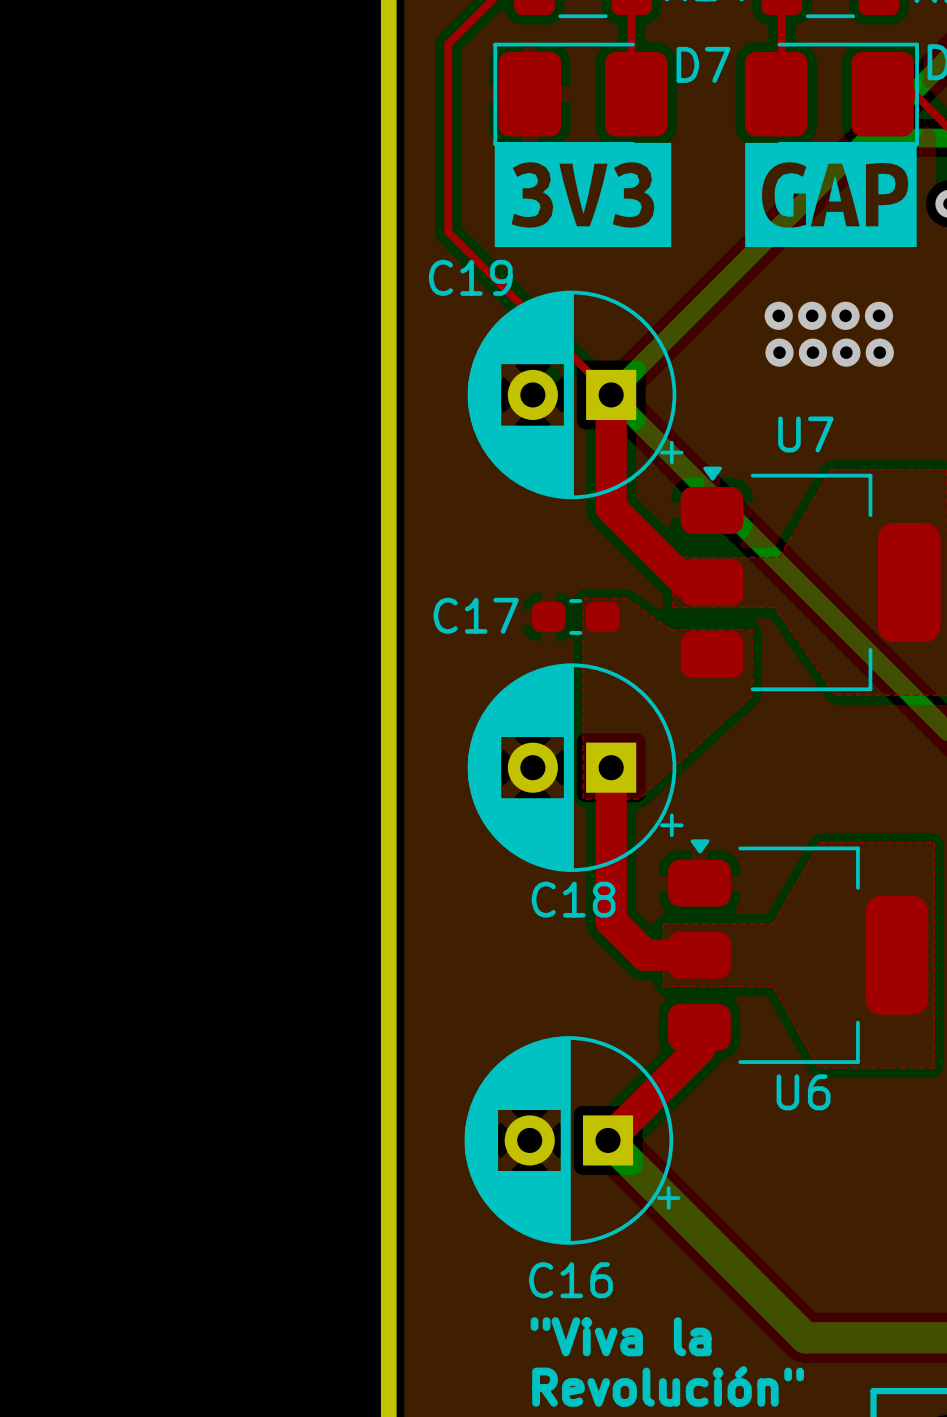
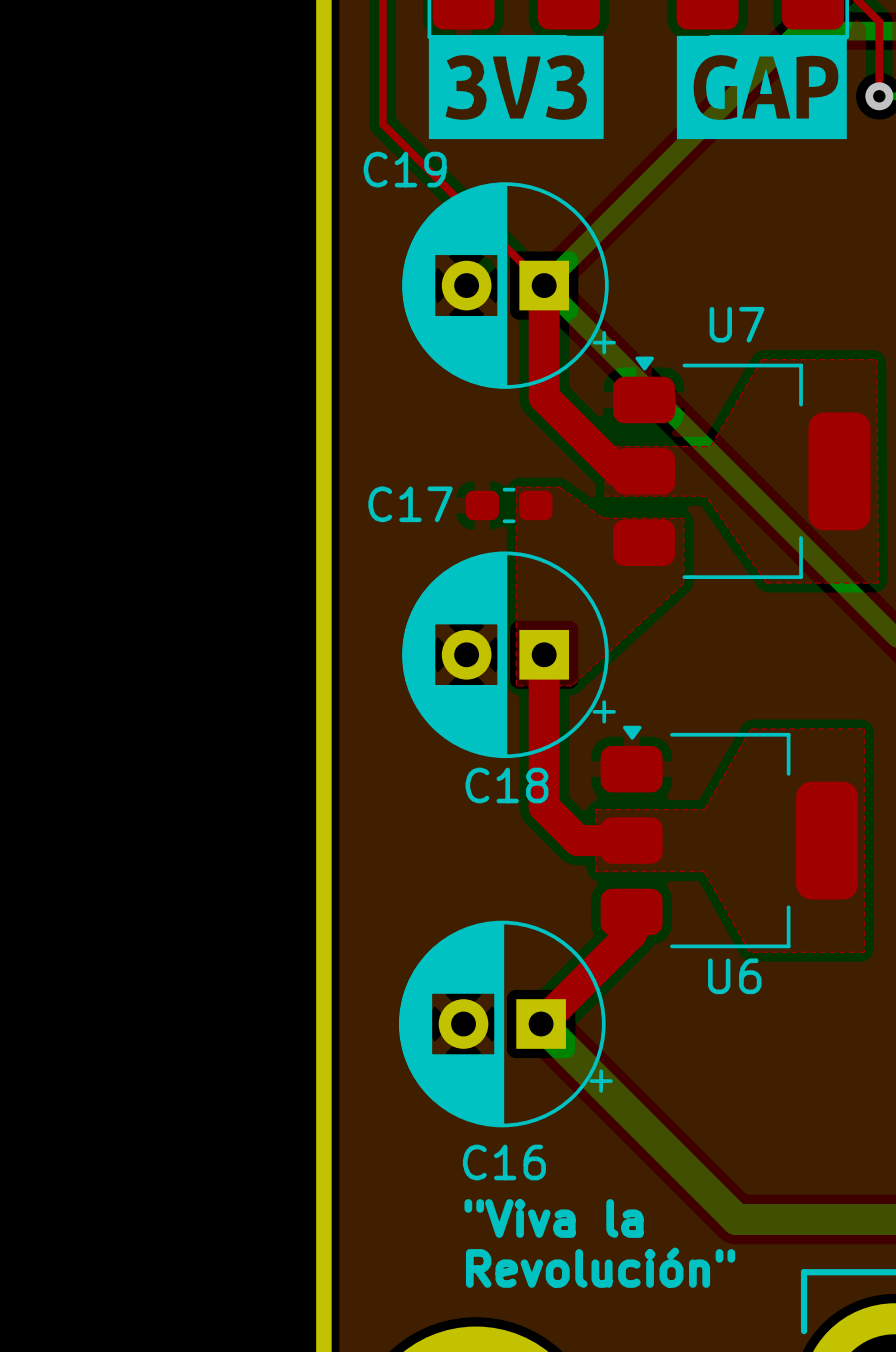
via: (778, 315) -> none
via: (812, 315) -> none
via: (845, 315) -> none
via: (878, 315) -> none
via: (779, 352) -> none
via: (812, 352) -> none
via: (846, 352) -> none
via: (879, 352) -> none

